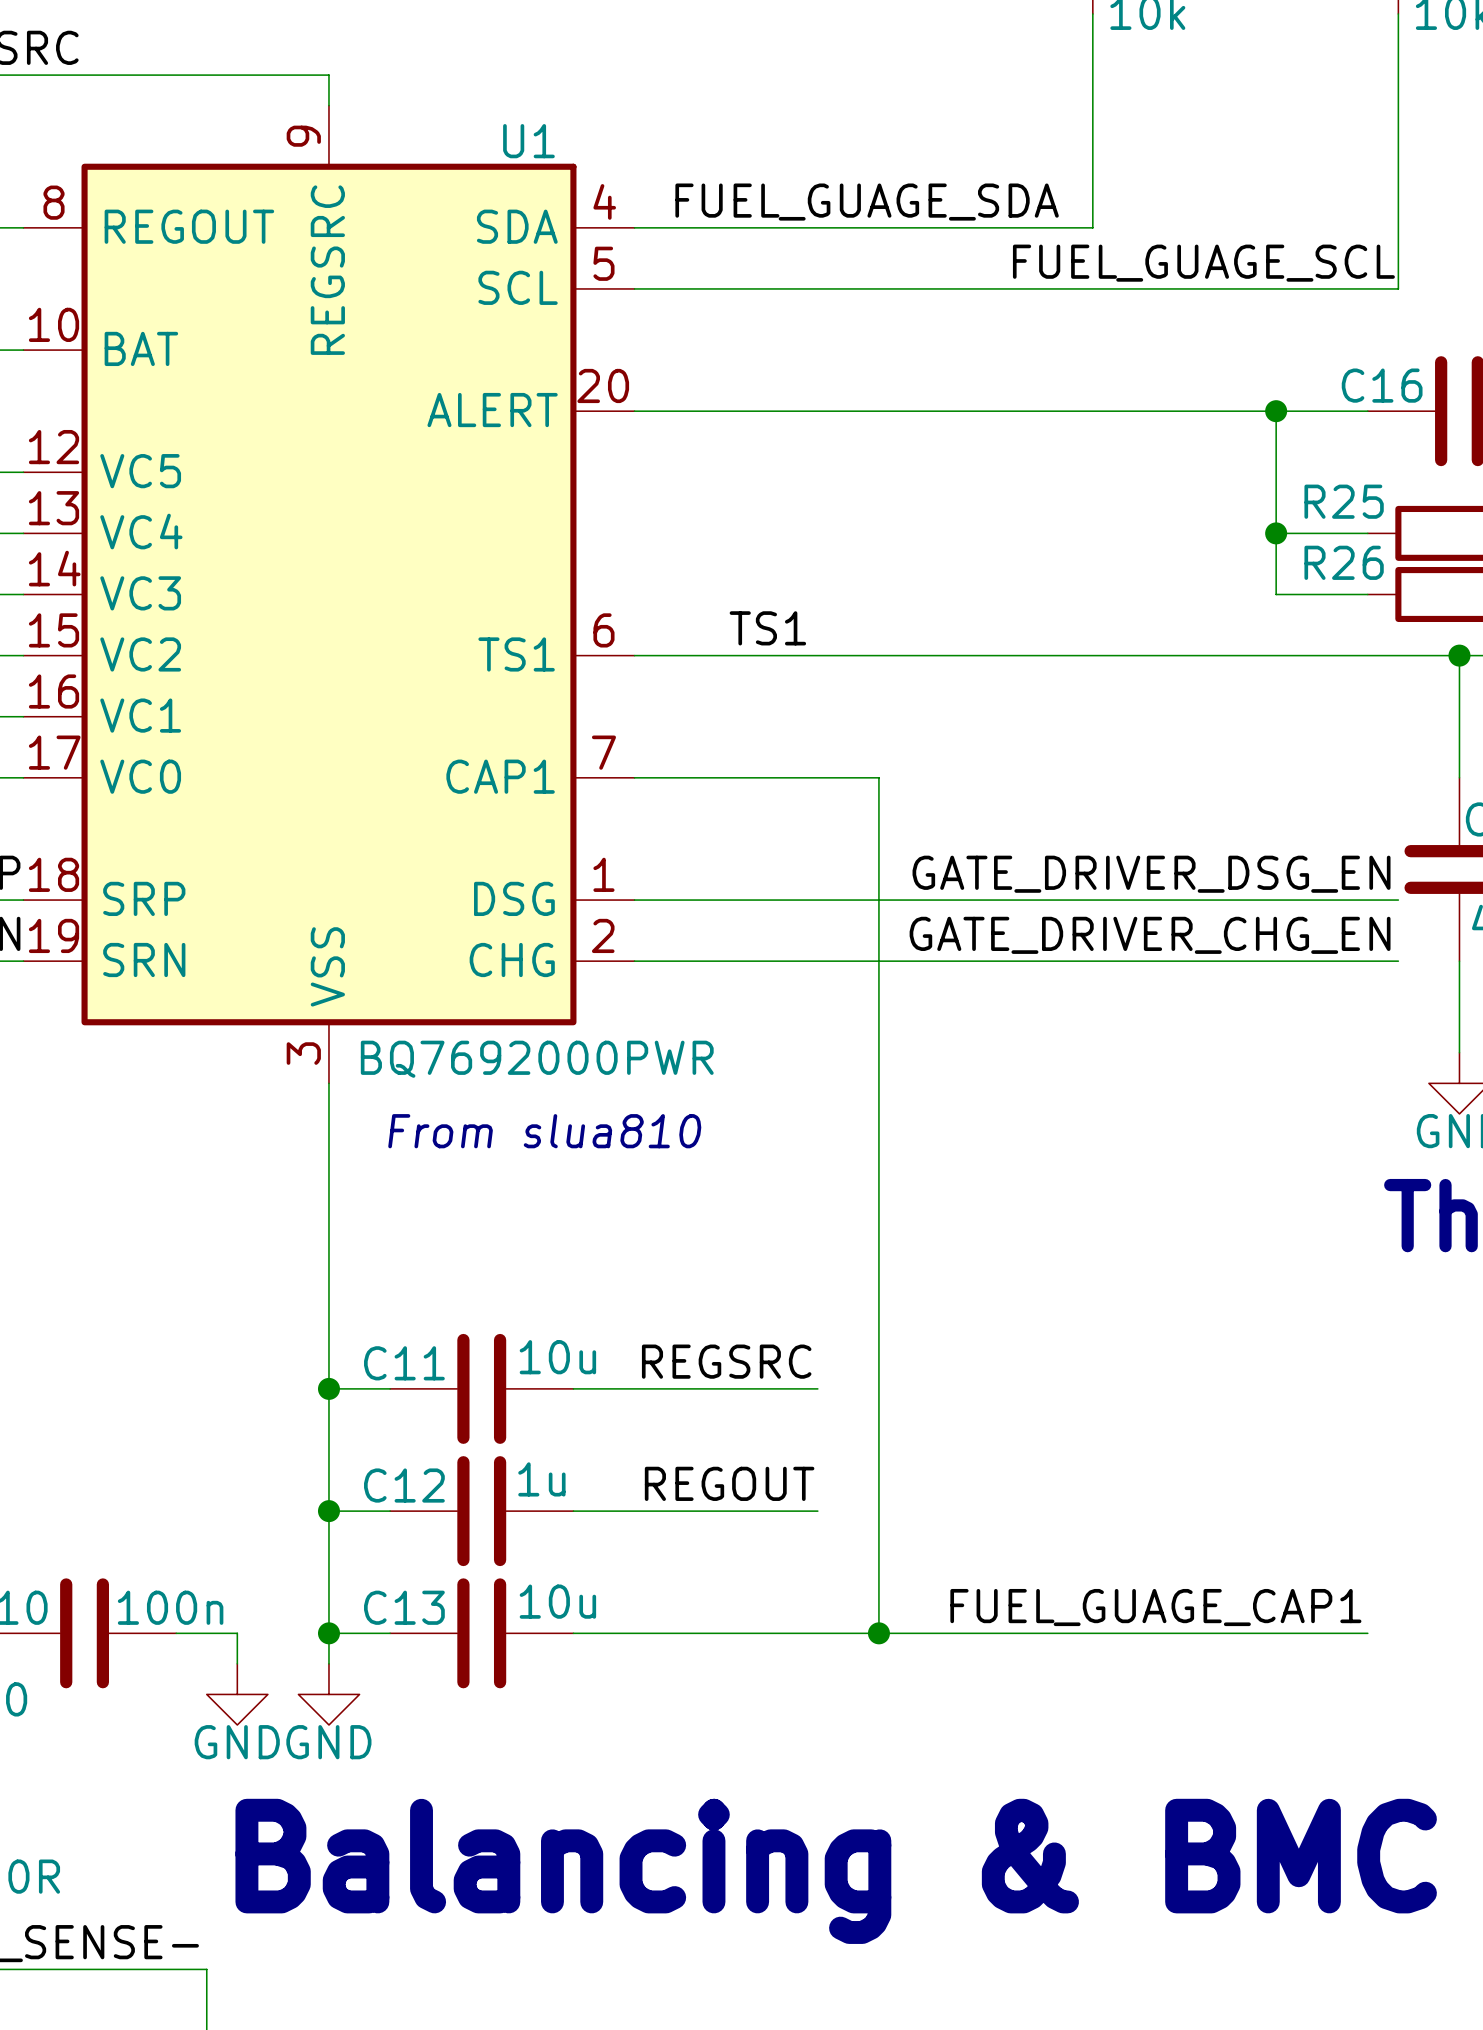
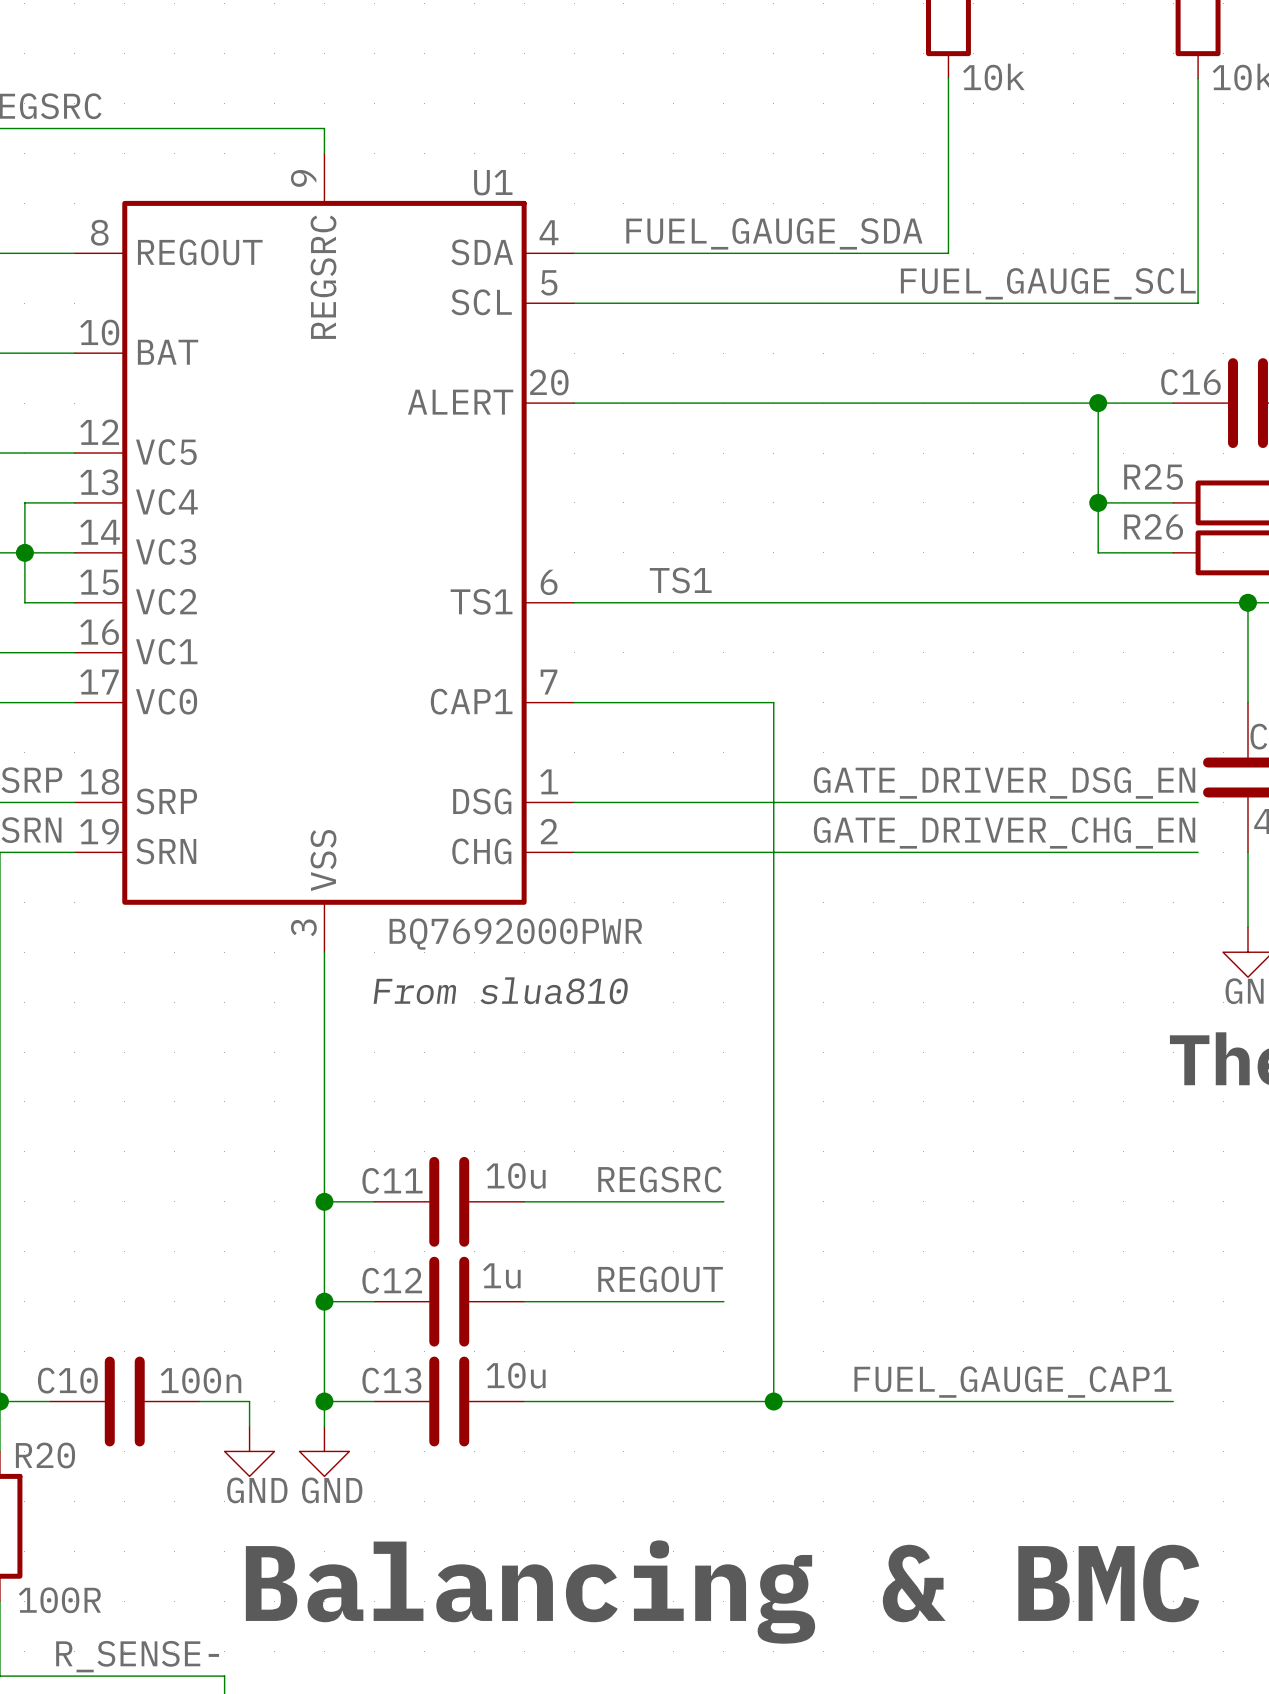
label: FUEL_GUAGE_SDA (867, 202) -> FUEL_GAUGE_SDA (774, 233)
label: FUEL_GUAGE_SCL (1203, 263) -> FUEL_GAUGE_SCL (1048, 283)
label: FUEL_GUAGE_CAP1 (1155, 1607) -> FUEL_GAUGE_CAP1 (1012, 1382)

